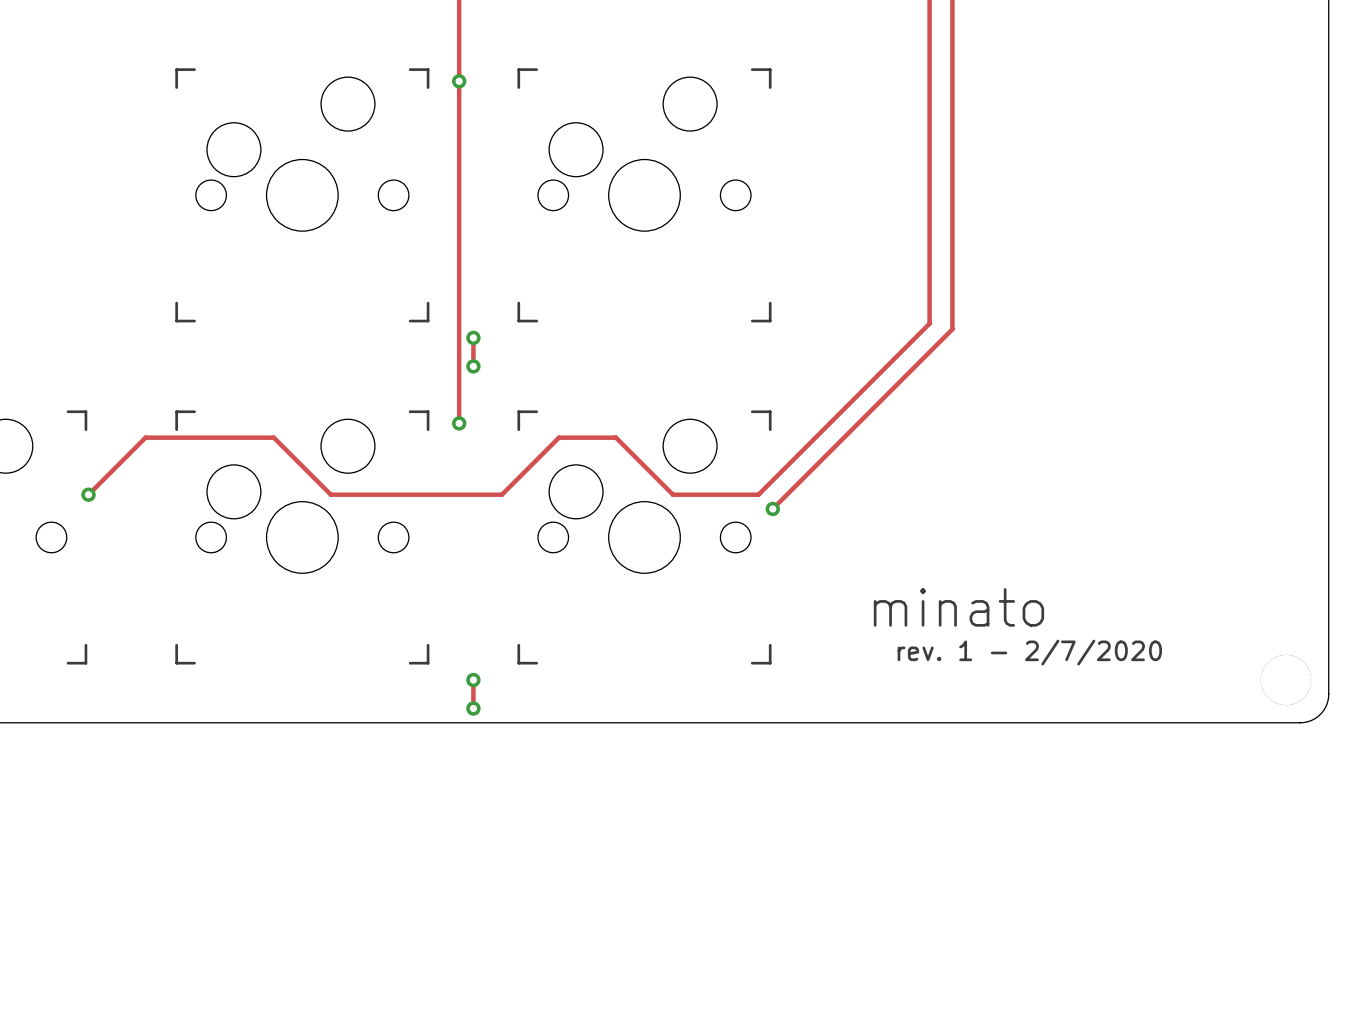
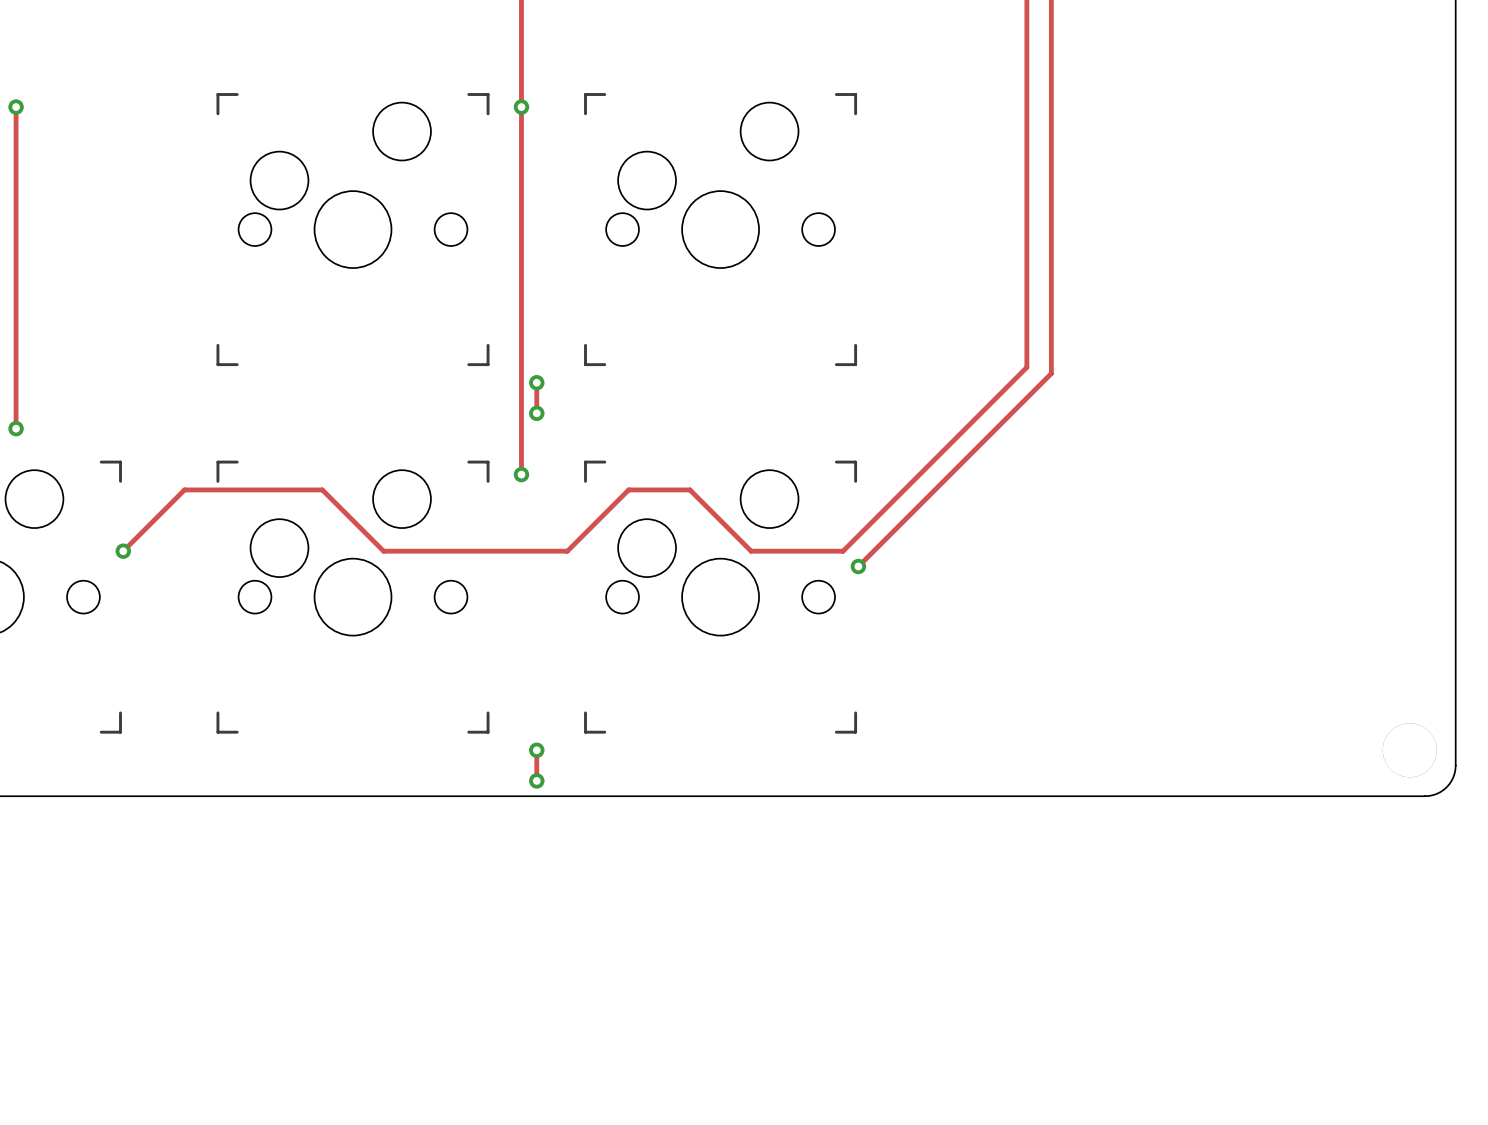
text: minato (958, 607) -> none
text: rev. 1 - 2/7/2020 (1029, 652) -> none

